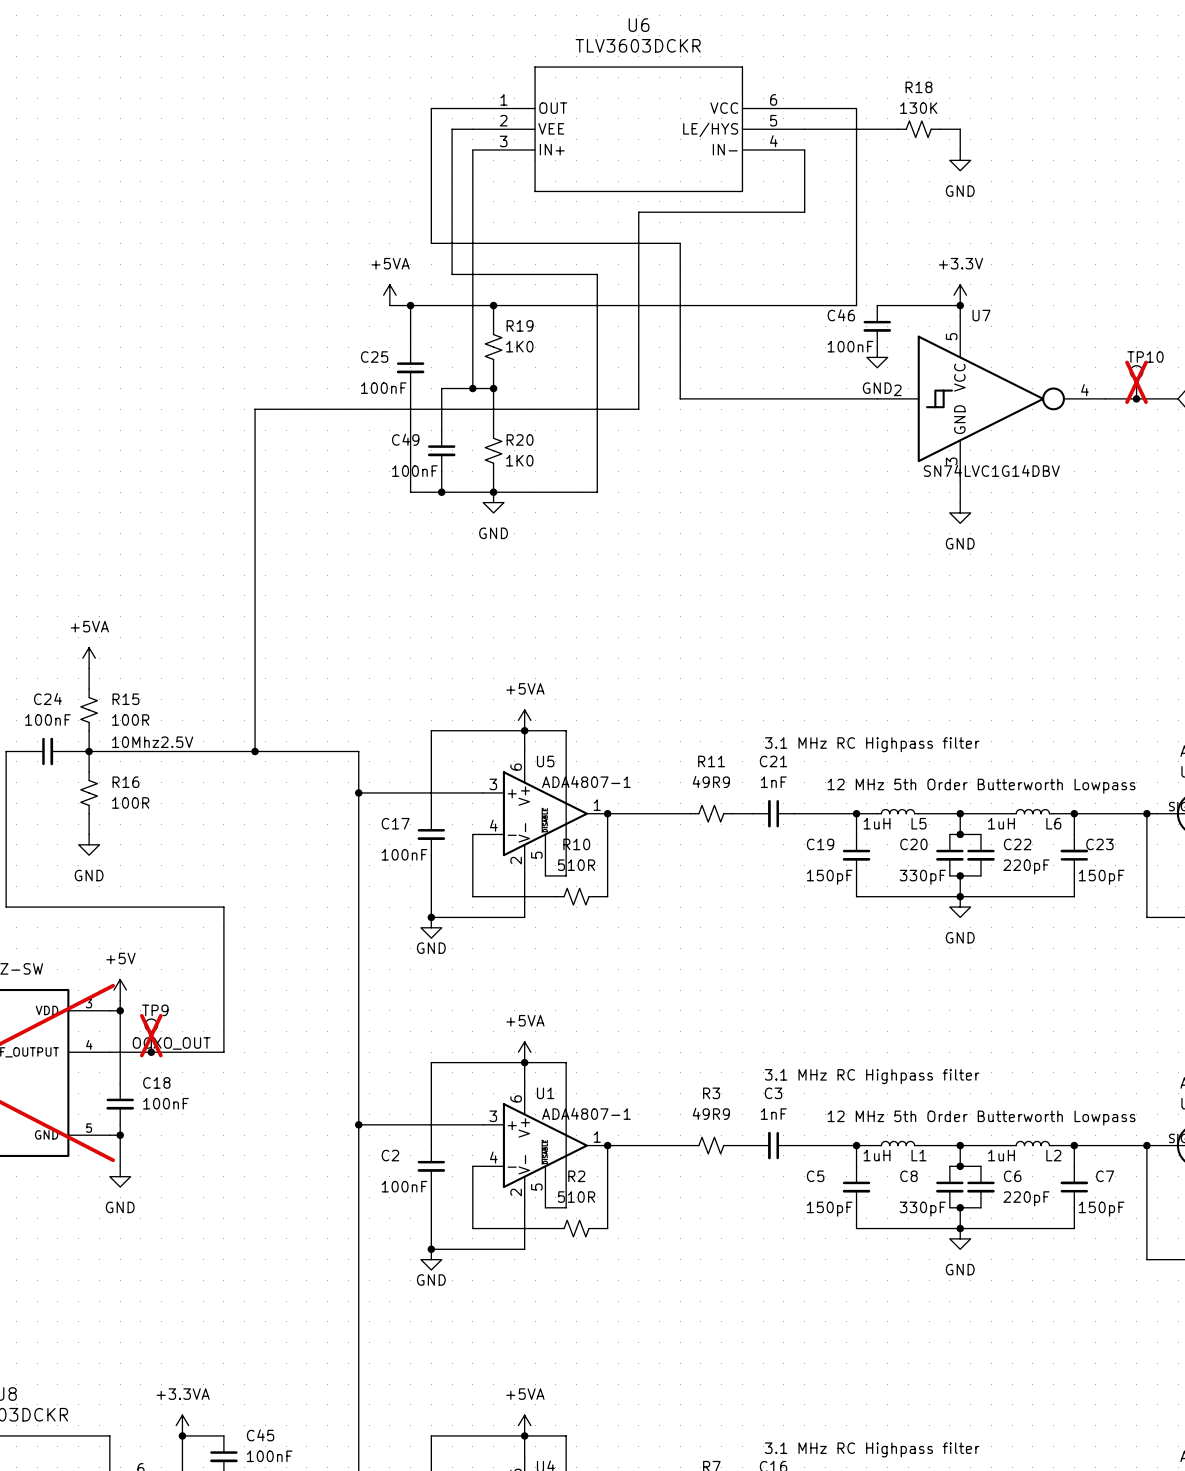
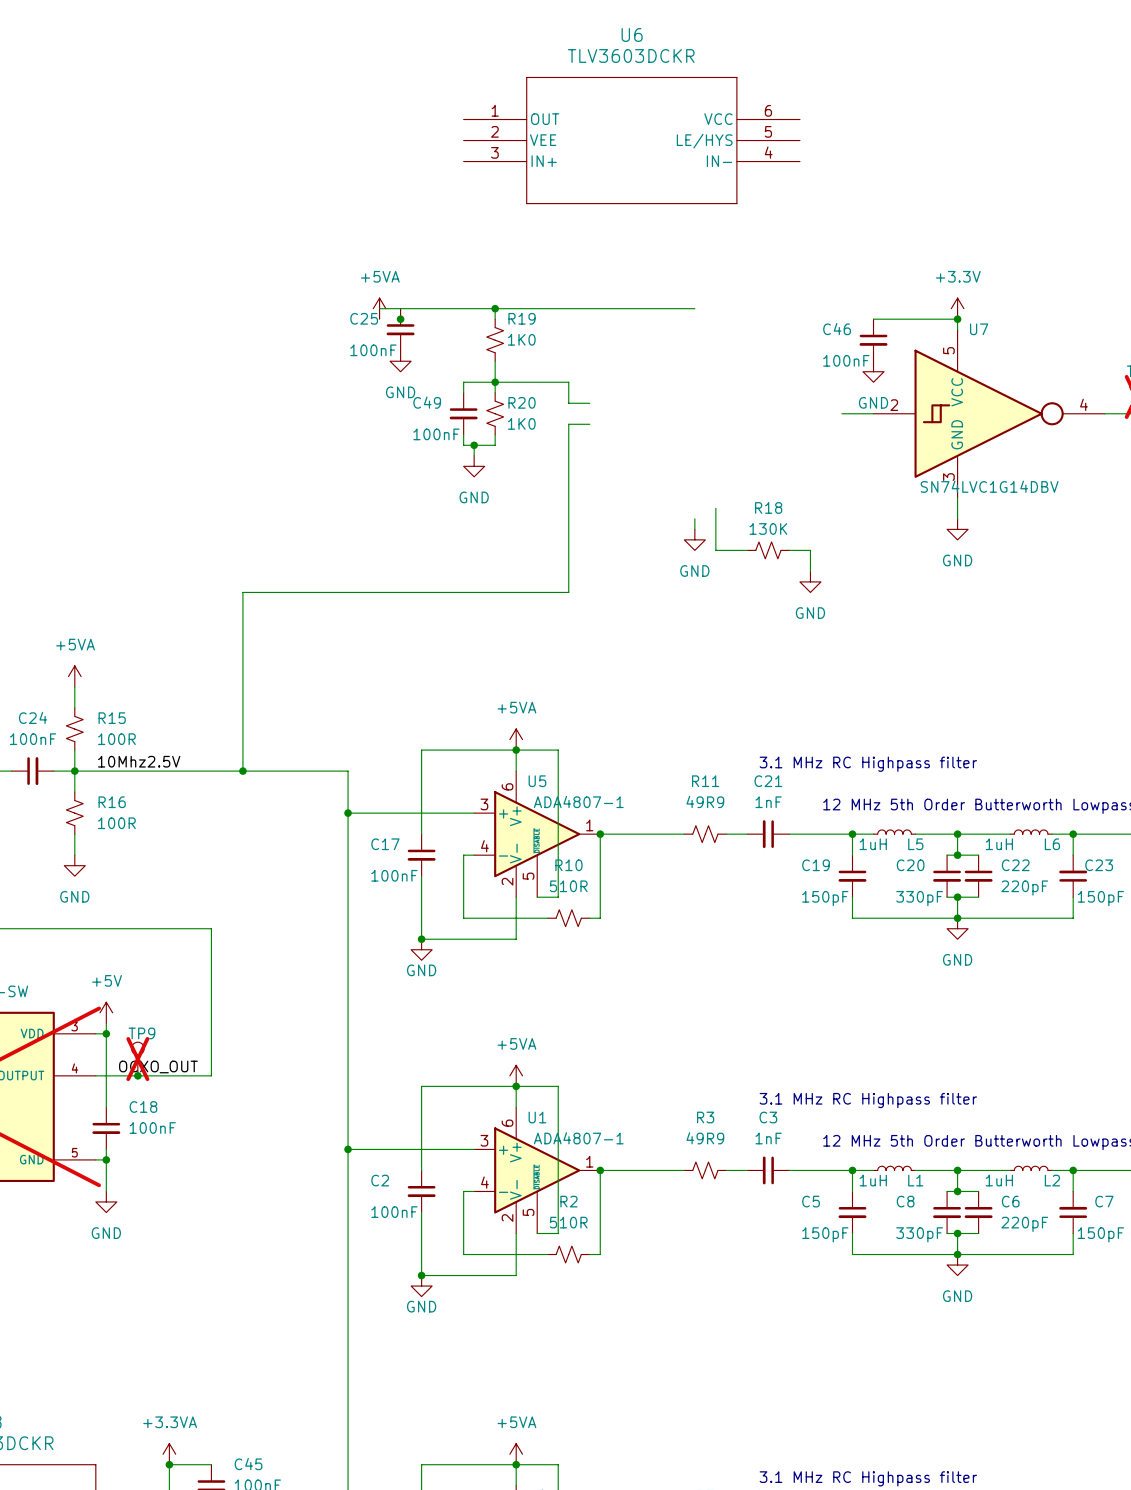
wire: (472, 108) (431, 108) (431, 243) (680, 243) (680, 398) (846, 398) -> none
wire: (804, 108) (856, 108) (856, 305) (389, 305) -> none
wire: (472, 129) (452, 129) (452, 274) (597, 274) (597, 492) (410, 492) (410, 388) -> none
wire: (804, 129) (898, 129) -> none
R18 position: (918, 129) -> (768, 550)
wire: (939, 129) (960, 129) (960, 150) -> none
wire: (472, 150) (472, 367) -> (589, 403) (568, 403) (568, 382) (463, 382)
wire: (804, 150) (804, 212) (638, 212) (638, 409) (597, 409) -> none
power symbol: GND (960, 160) -> none
wire: none -> (379, 308) (694, 308)
wire: none -> (495, 308) (495, 319)
wire: (493, 305) (493, 326) -> none
junction position: (493, 305) -> (495, 308)
power symbol: none -> GND (400, 361)
R19 position: (493, 347) -> (495, 340)
wire: none -> (495, 361) (495, 392)
C25 position: (410, 367) -> (400, 329)
wire: (493, 367) (493, 430) -> none
junction: none -> (495, 382)
junction: (472, 388) -> none
wire: (493, 388) (441, 388) (441, 430) -> none
junction: (493, 388) -> none
wire: (576, 409) (255, 409) (255, 575) -> (568, 424) (568, 592) (242, 592)
wire: none -> (463, 434) (463, 445) (495, 445) (495, 434)
junction: none -> (474, 445)
C49 position: (441, 450) -> (463, 413)
R20 position: (493, 450) -> (495, 413)
wire: (441, 471) (441, 492) -> none
wire: (493, 471) (493, 492) -> none
junction: (441, 492) -> none
junction: (493, 492) -> none
wire: none -> (715, 508) (715, 550) (747, 550)
power symbol position: GND (493, 502) -> GND (474, 466)
wire: none -> (694, 518) (694, 529)
power symbol: none -> GND (694, 539)
wire: none -> (789, 550) (810, 550) (810, 571)
power symbol: none -> GND (810, 581)

